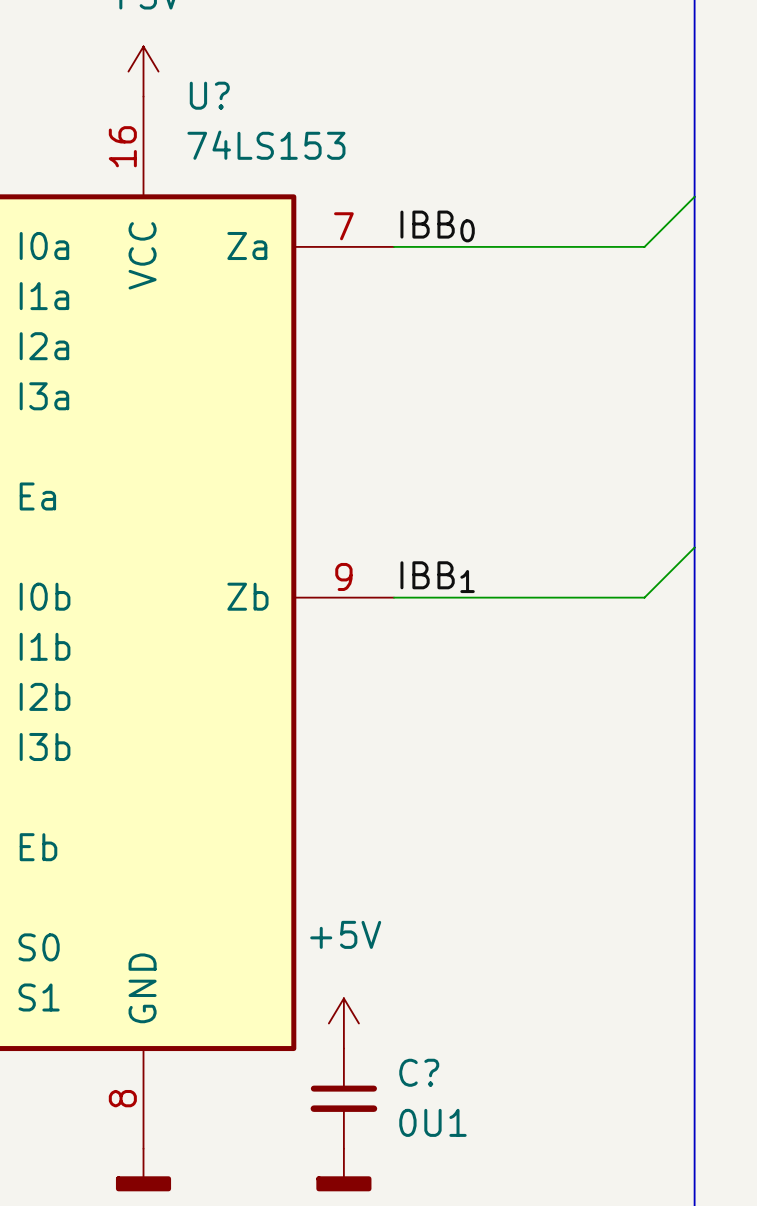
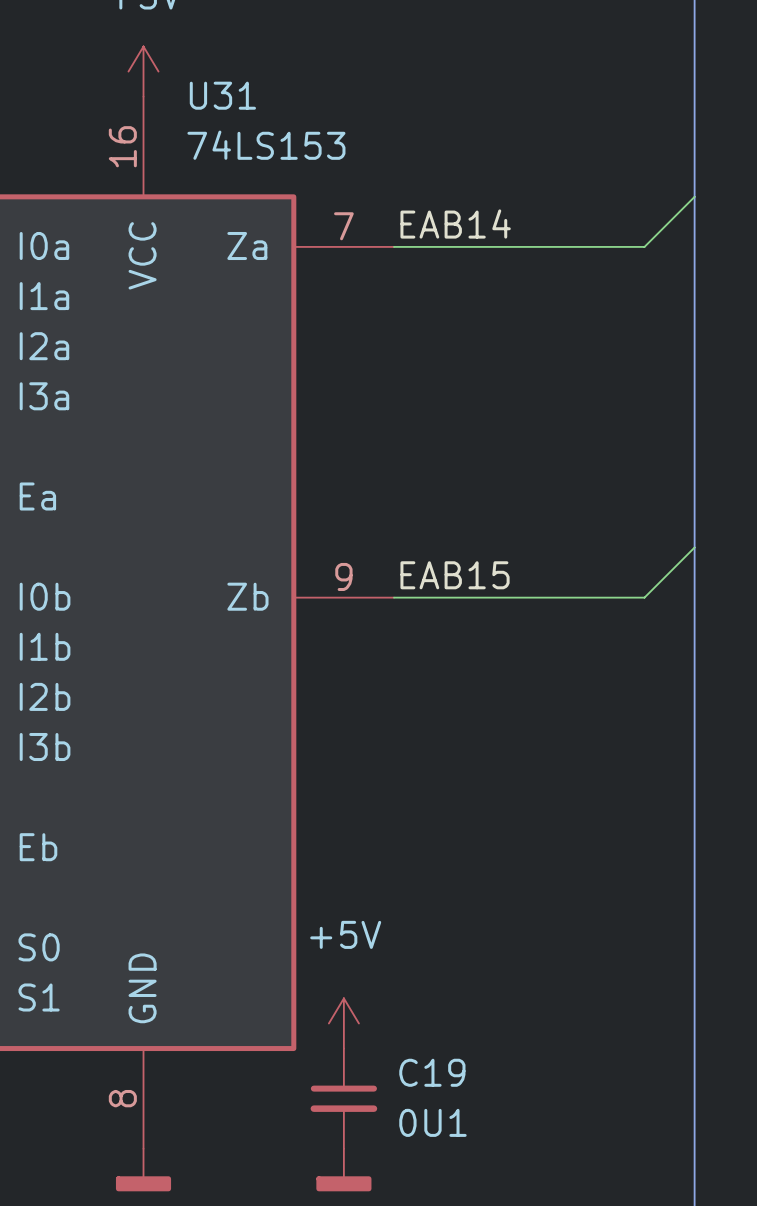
U? name: U? (209, 95) -> U31 (222, 95)
label: IBB0 (437, 226) -> EAB14 (455, 223)
label: IBB1 (437, 577) -> EAB15 (455, 575)
C? name: C? (419, 1072) -> C19 (432, 1072)

